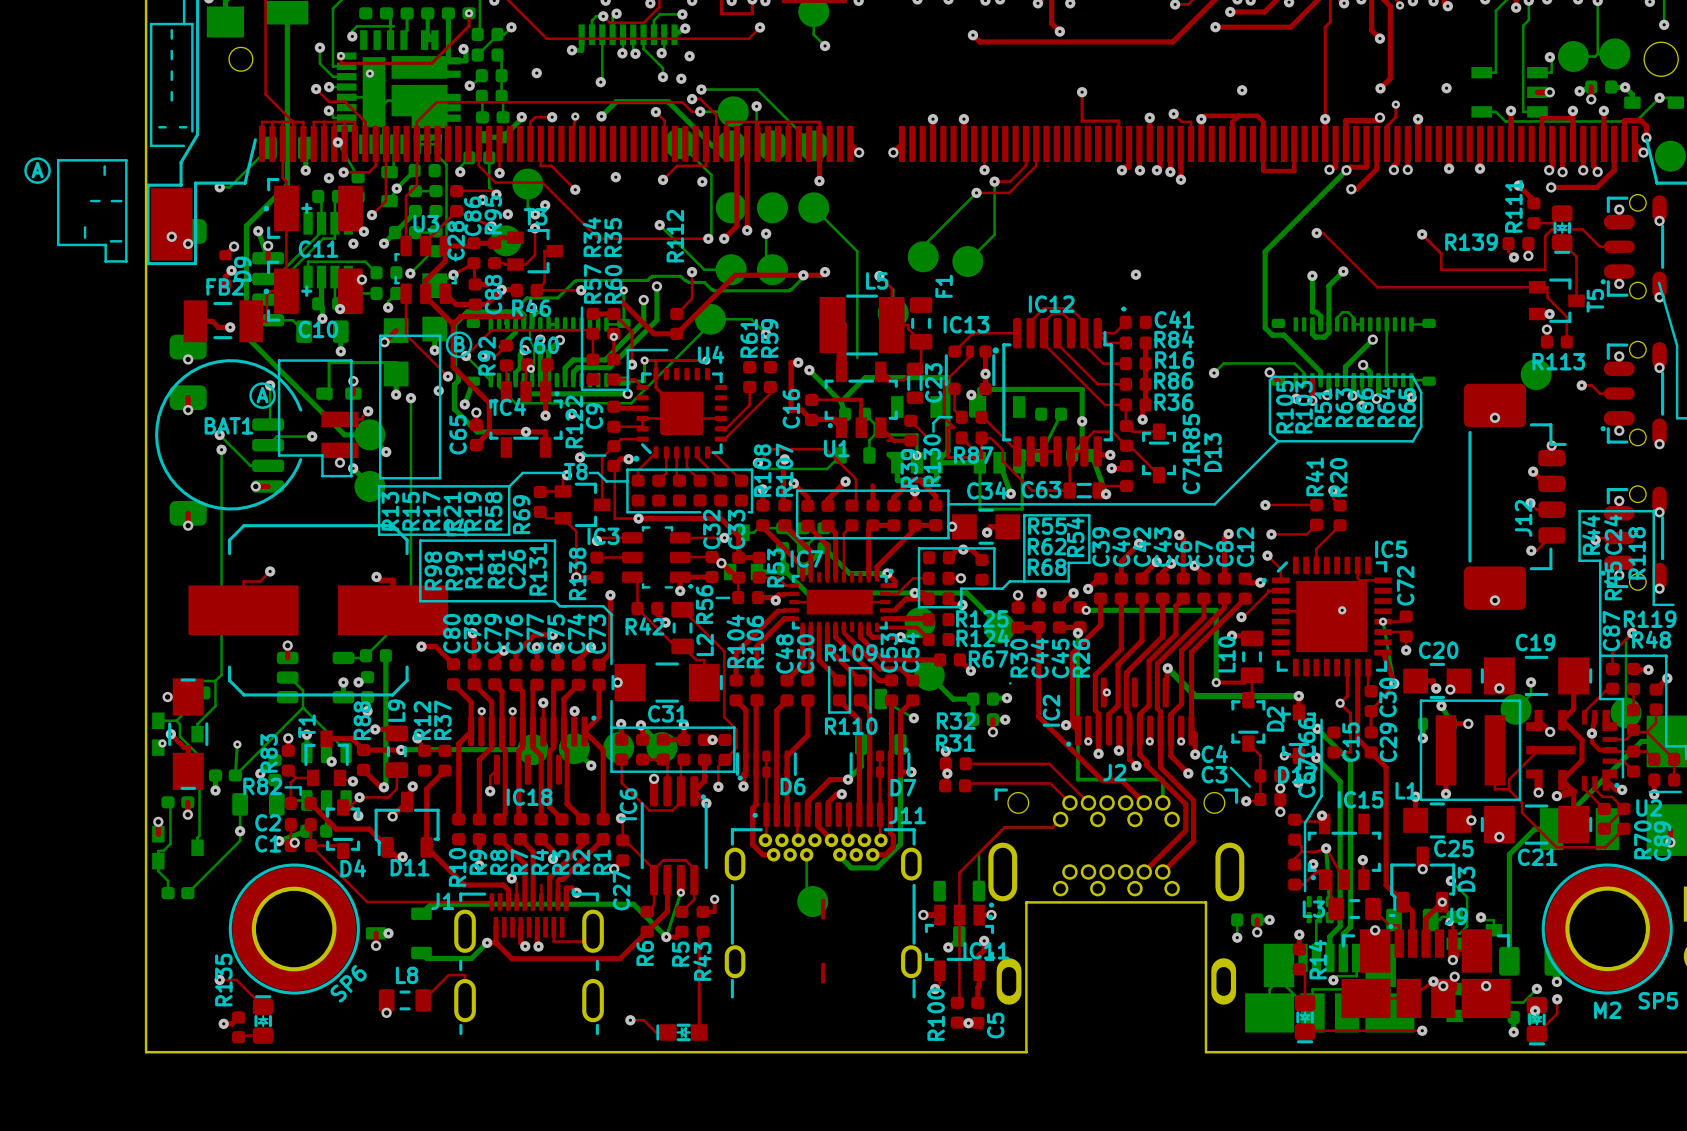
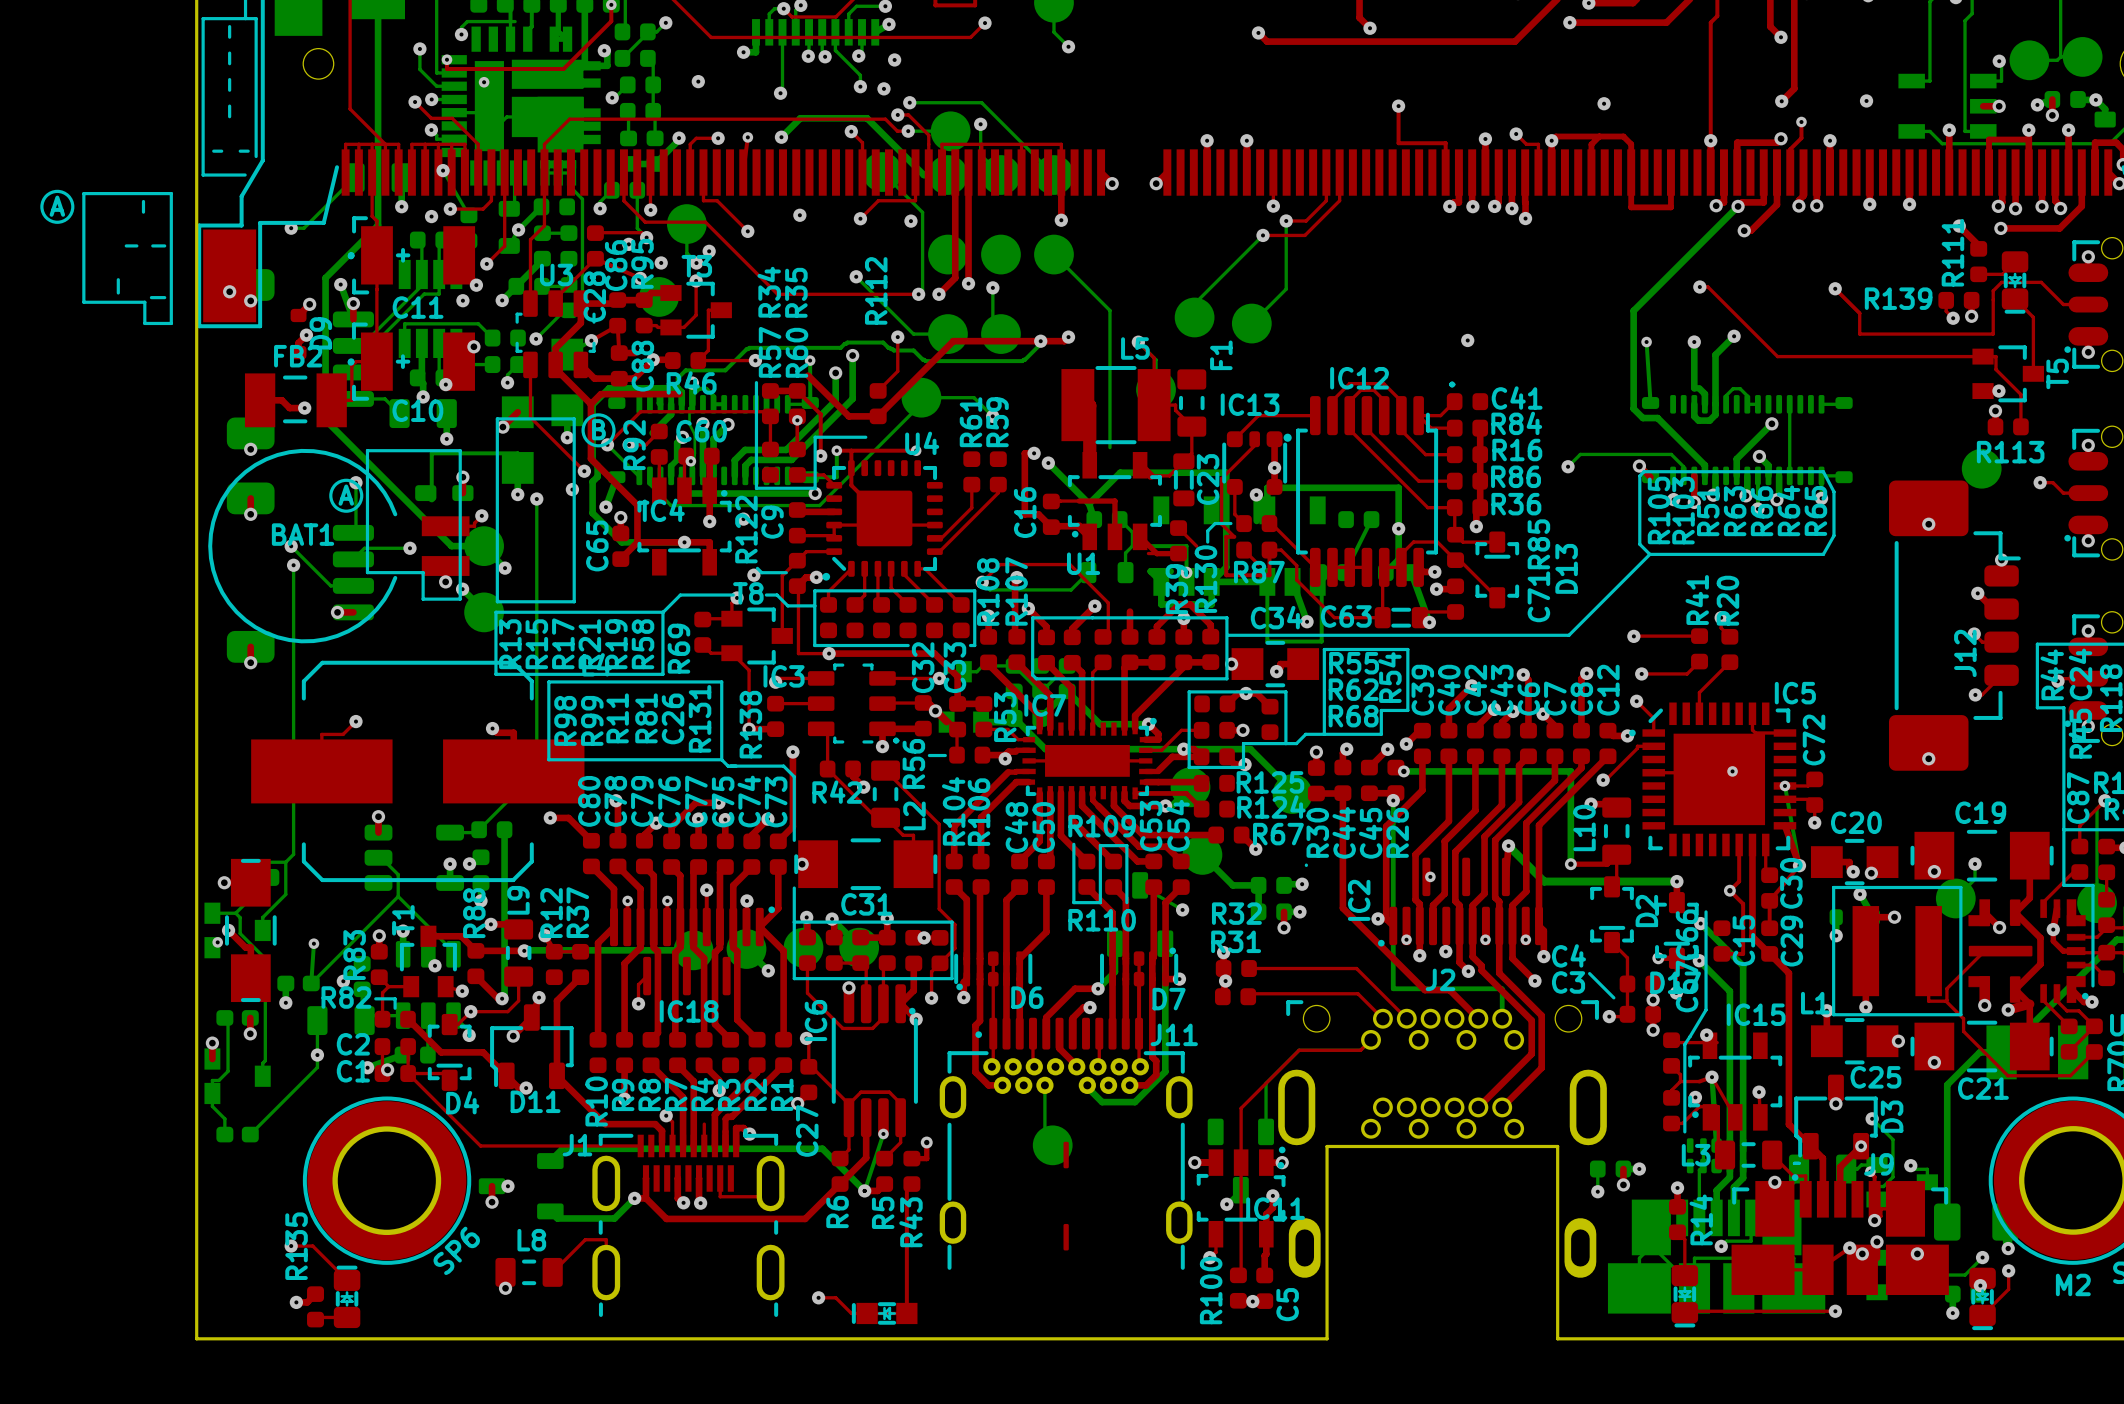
bottom track: none -> (1646, 342) (1650, 402)
via: none -> (1646, 342)

